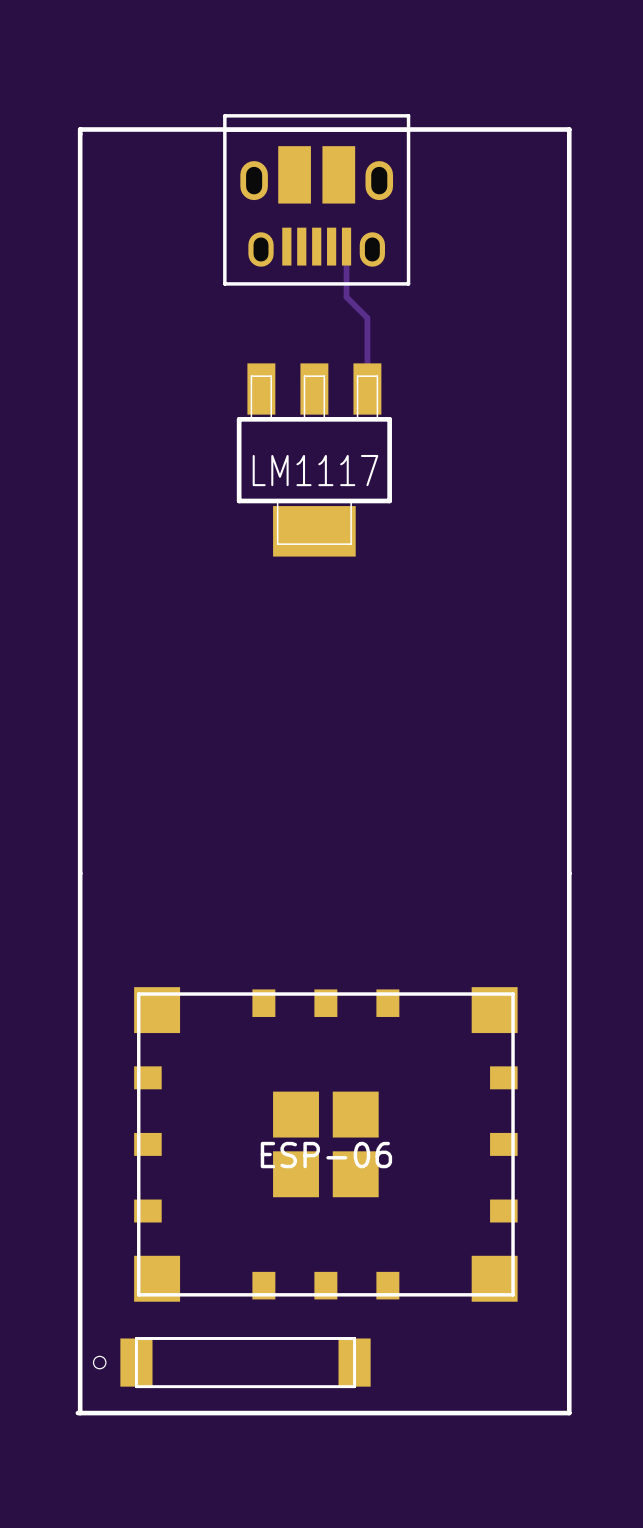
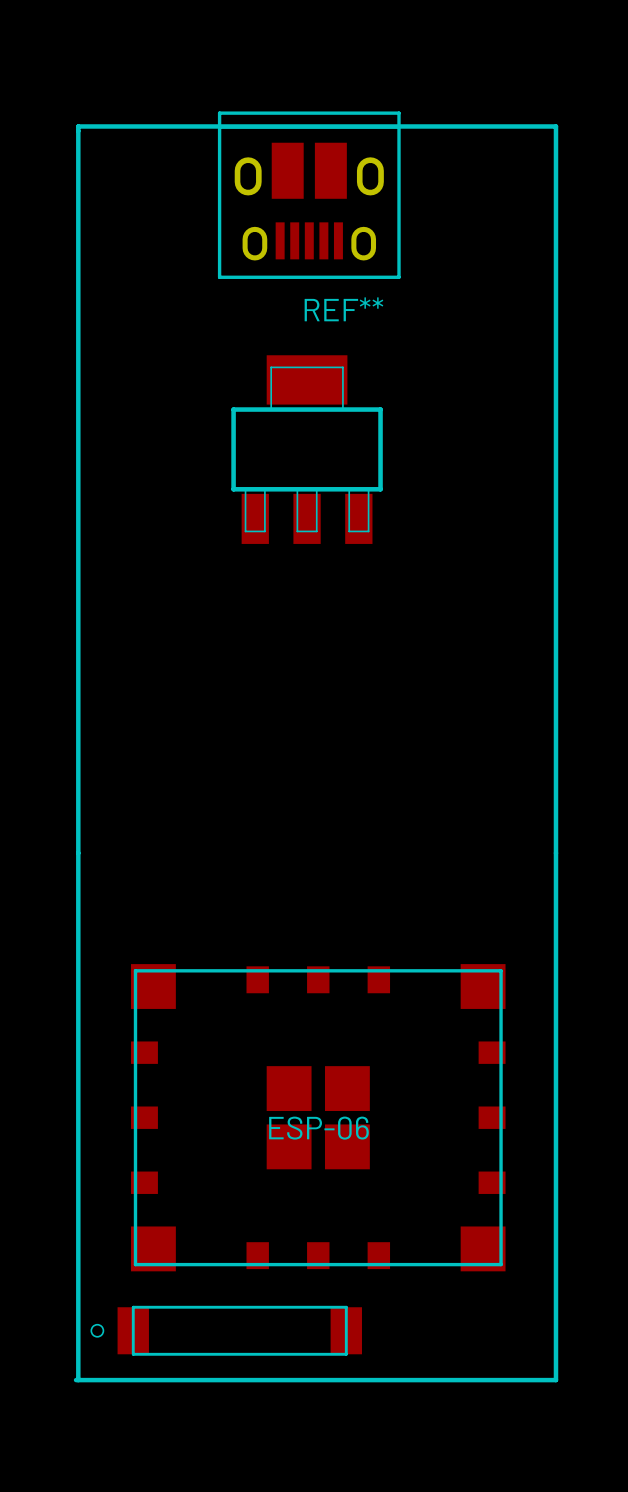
track: (346, 246) (346, 297) (367, 317) (367, 389) -> none
REF** name: none -> REF** (343, 309)
LM1117: (314, 459) -> none
part: none -> (307, 449)

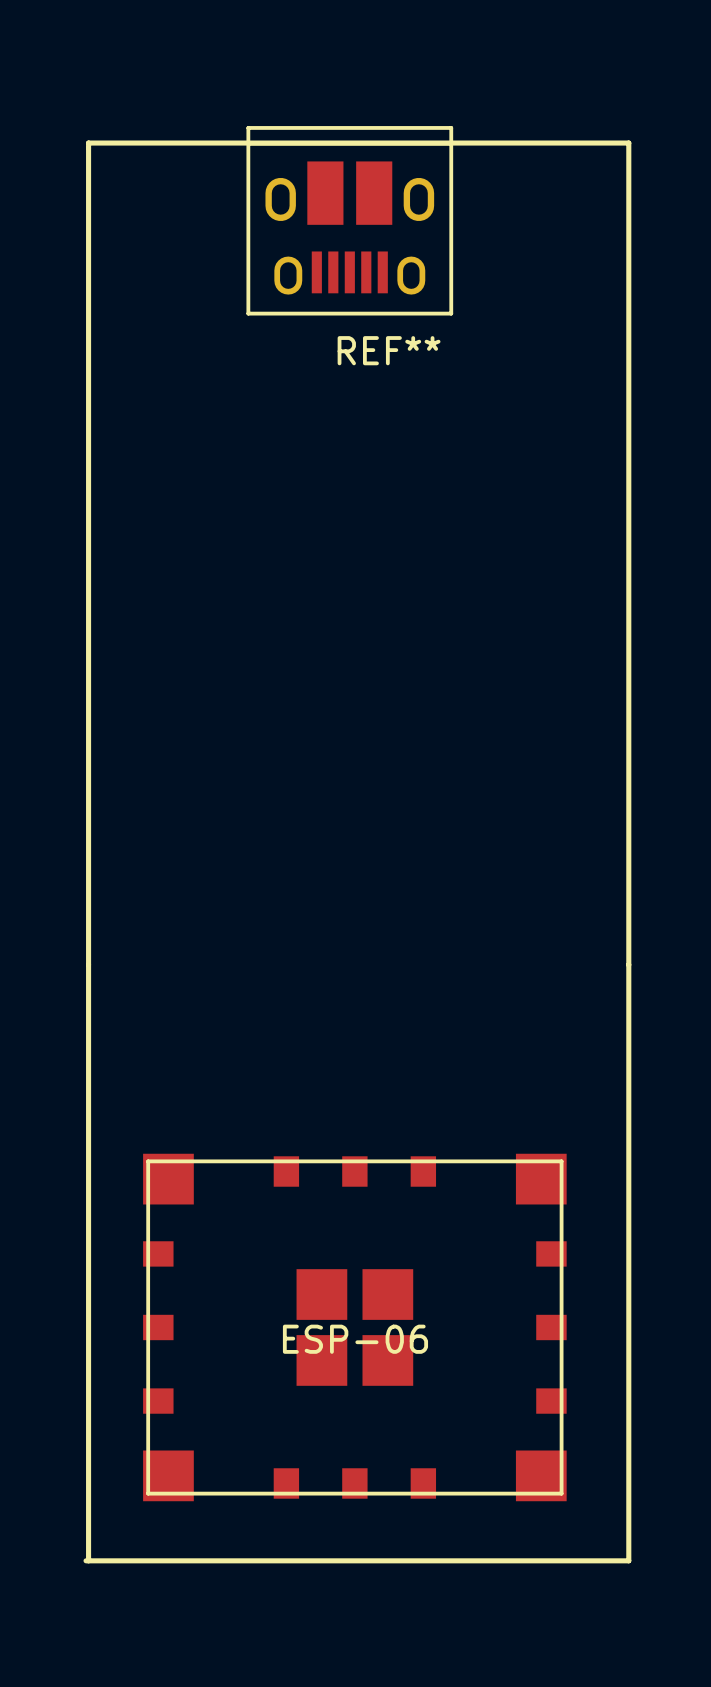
part: (307, 449) -> none
ESP-06 position: (318, 1117) -> (354, 1327)
part: (226, 1330) -> none

